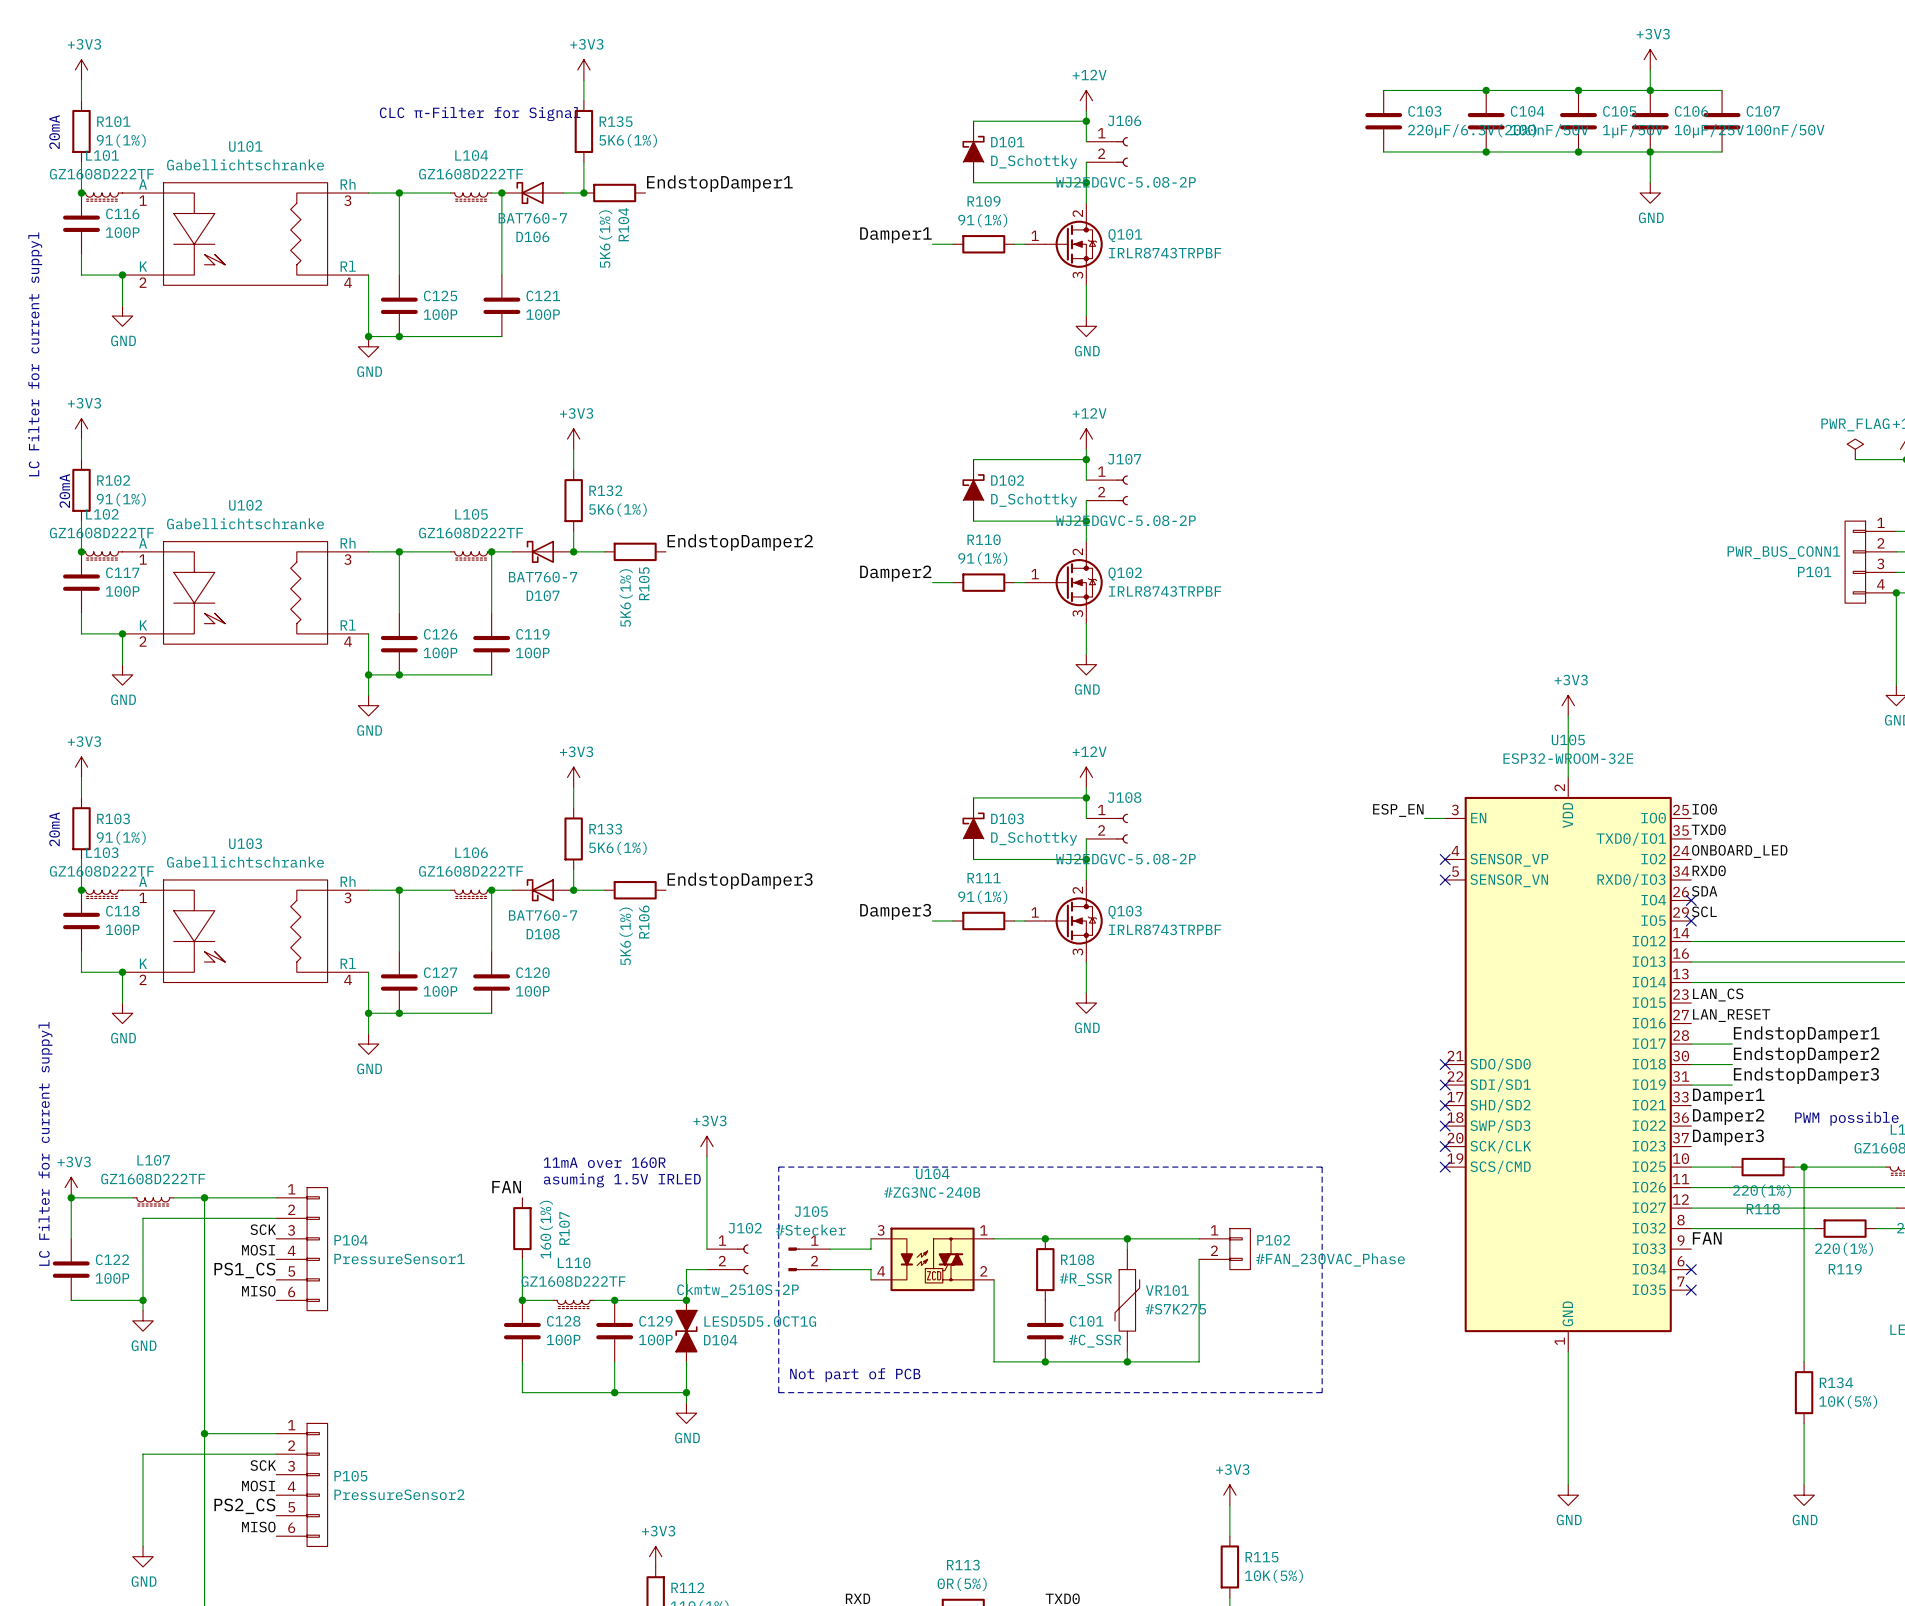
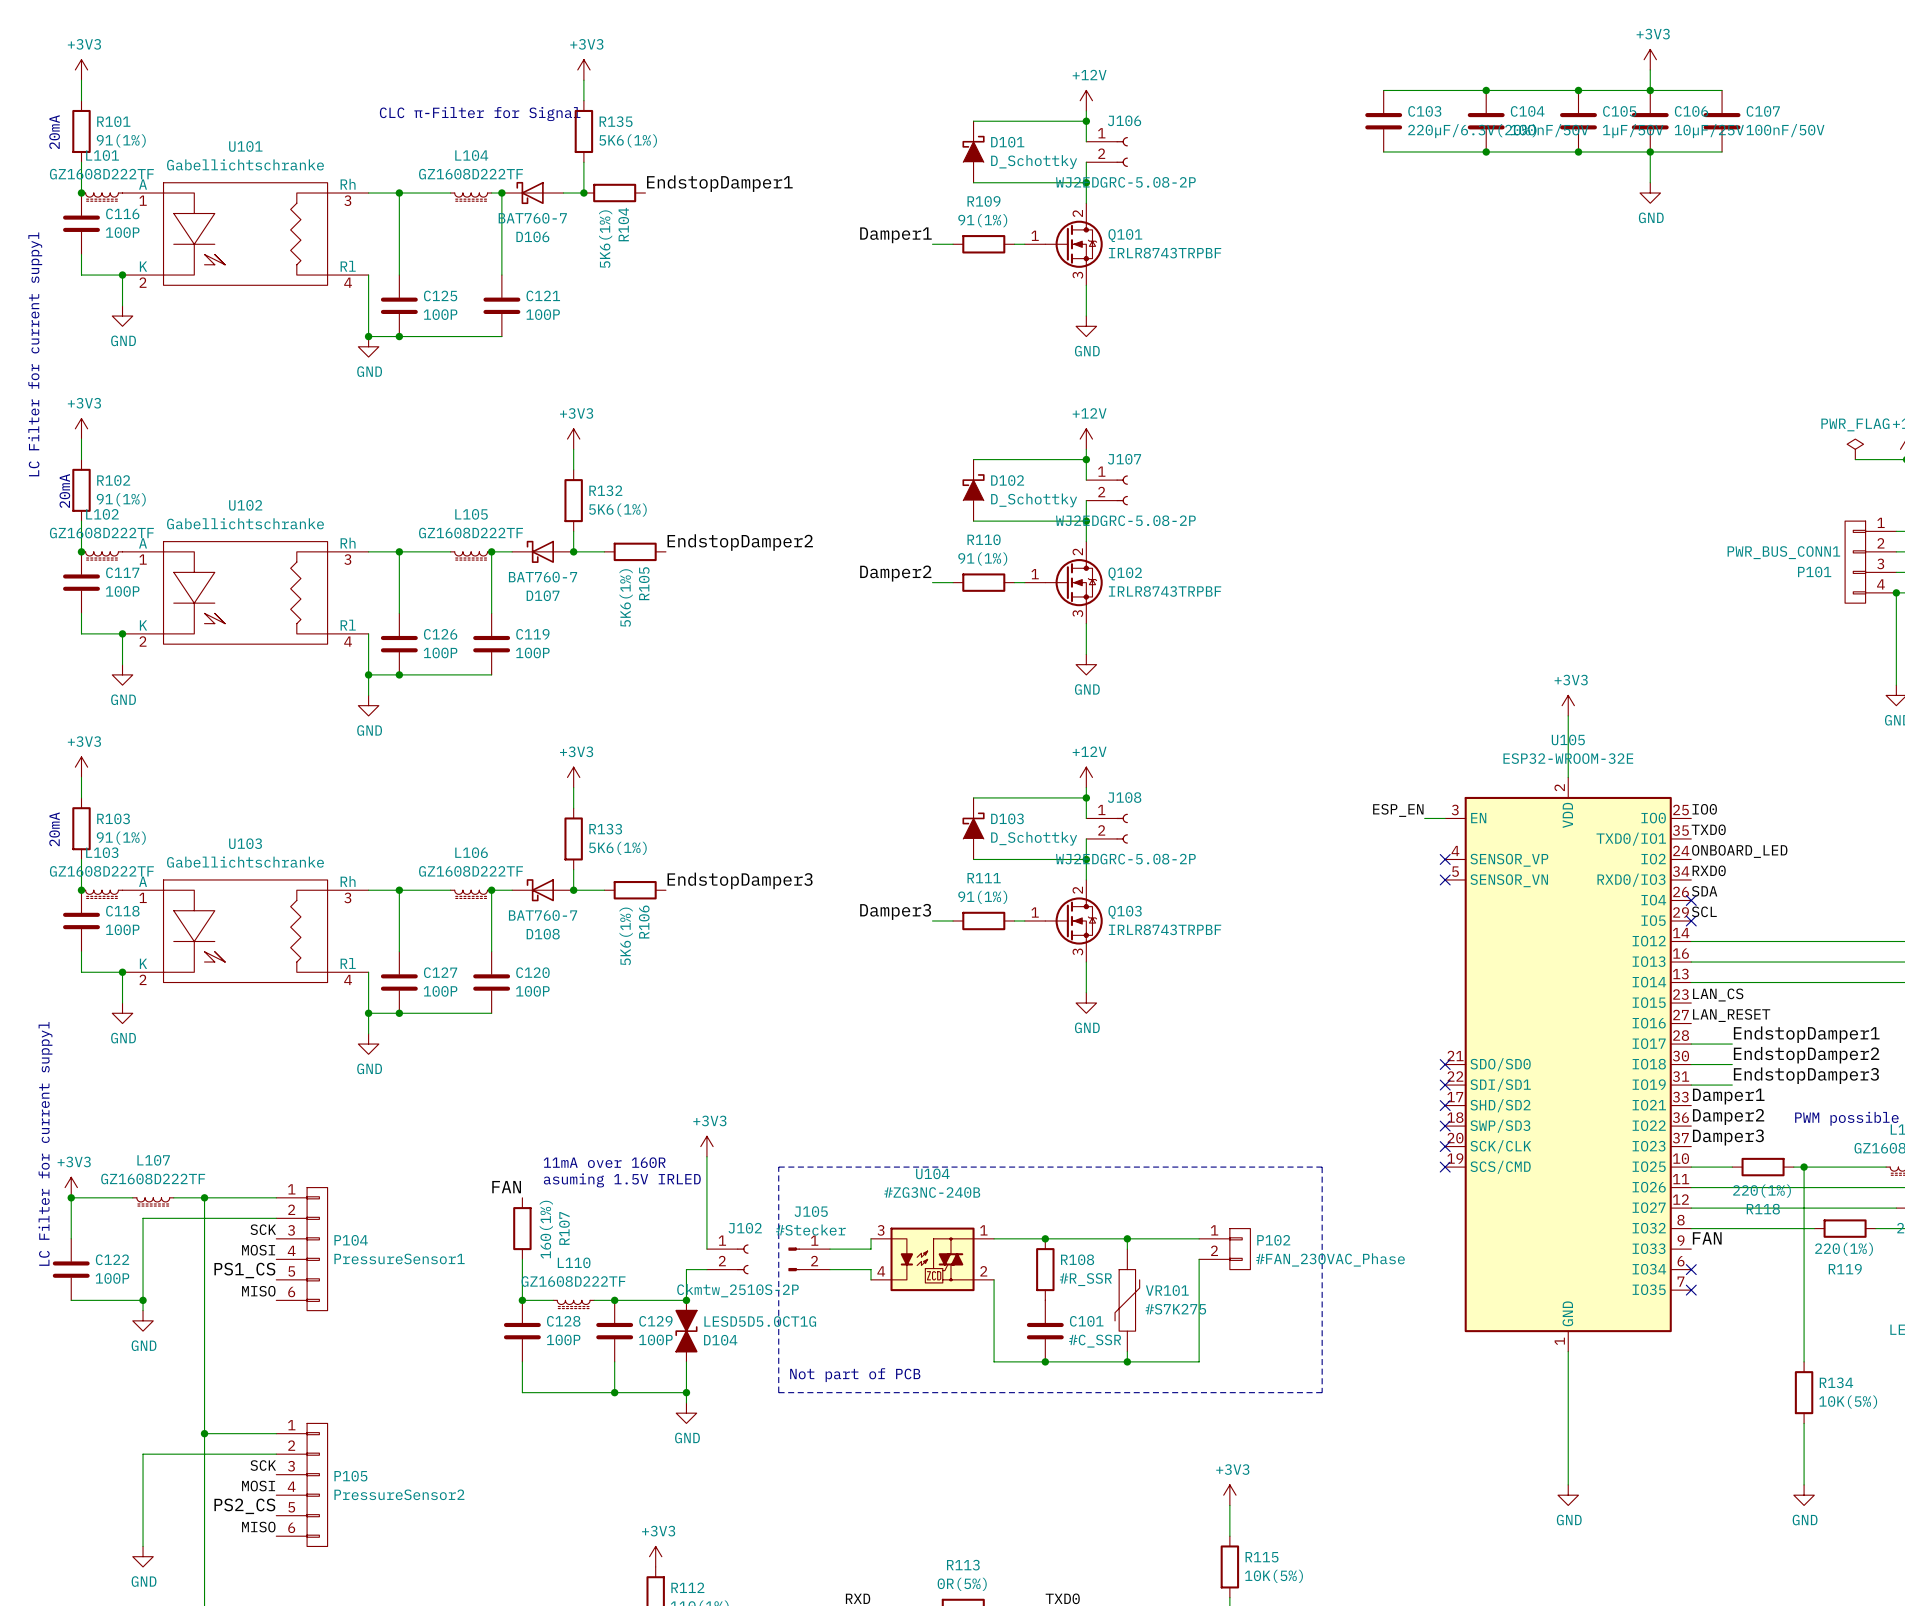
J106 value: WJ2EDGVC-5.08-2P (1125, 182) -> WJ2EDGRC-5.08-2P (1125, 182)
J107 value: WJ2EDGVC-5.08-2P (1125, 520) -> WJ2EDGRC-5.08-2P (1125, 520)
J108 value: WJ2EDGVC-5.08-2P (1125, 859) -> WJ2EDGRC-5.08-2P (1125, 859)

